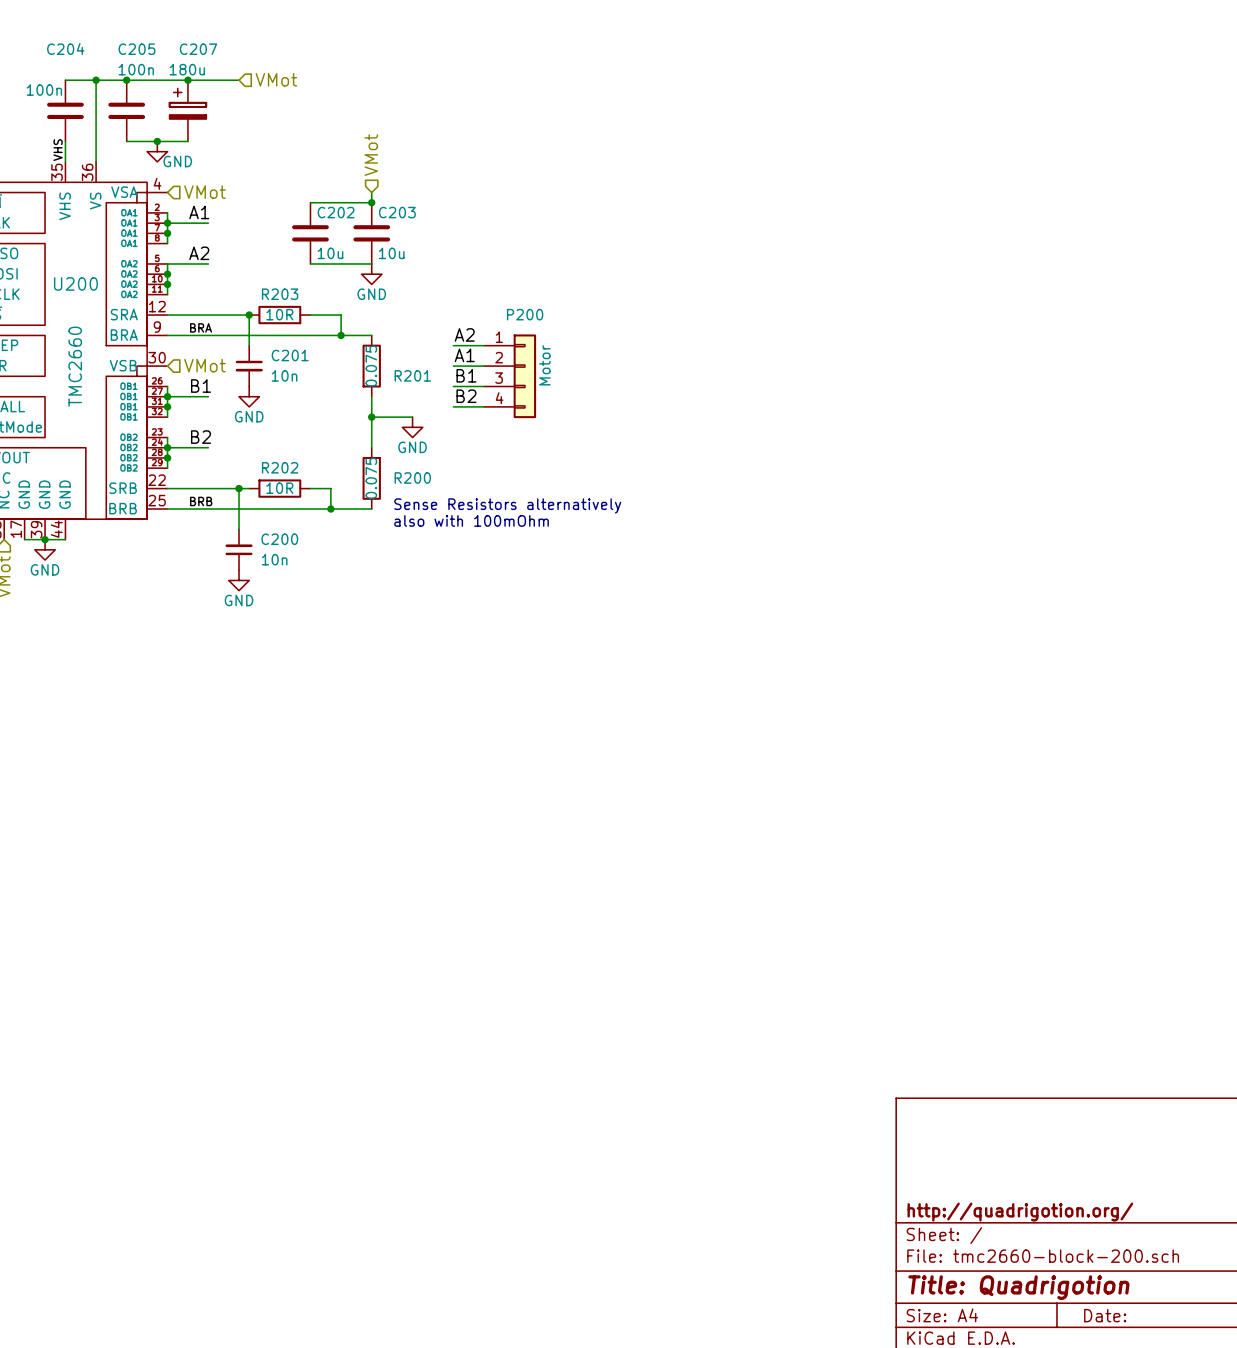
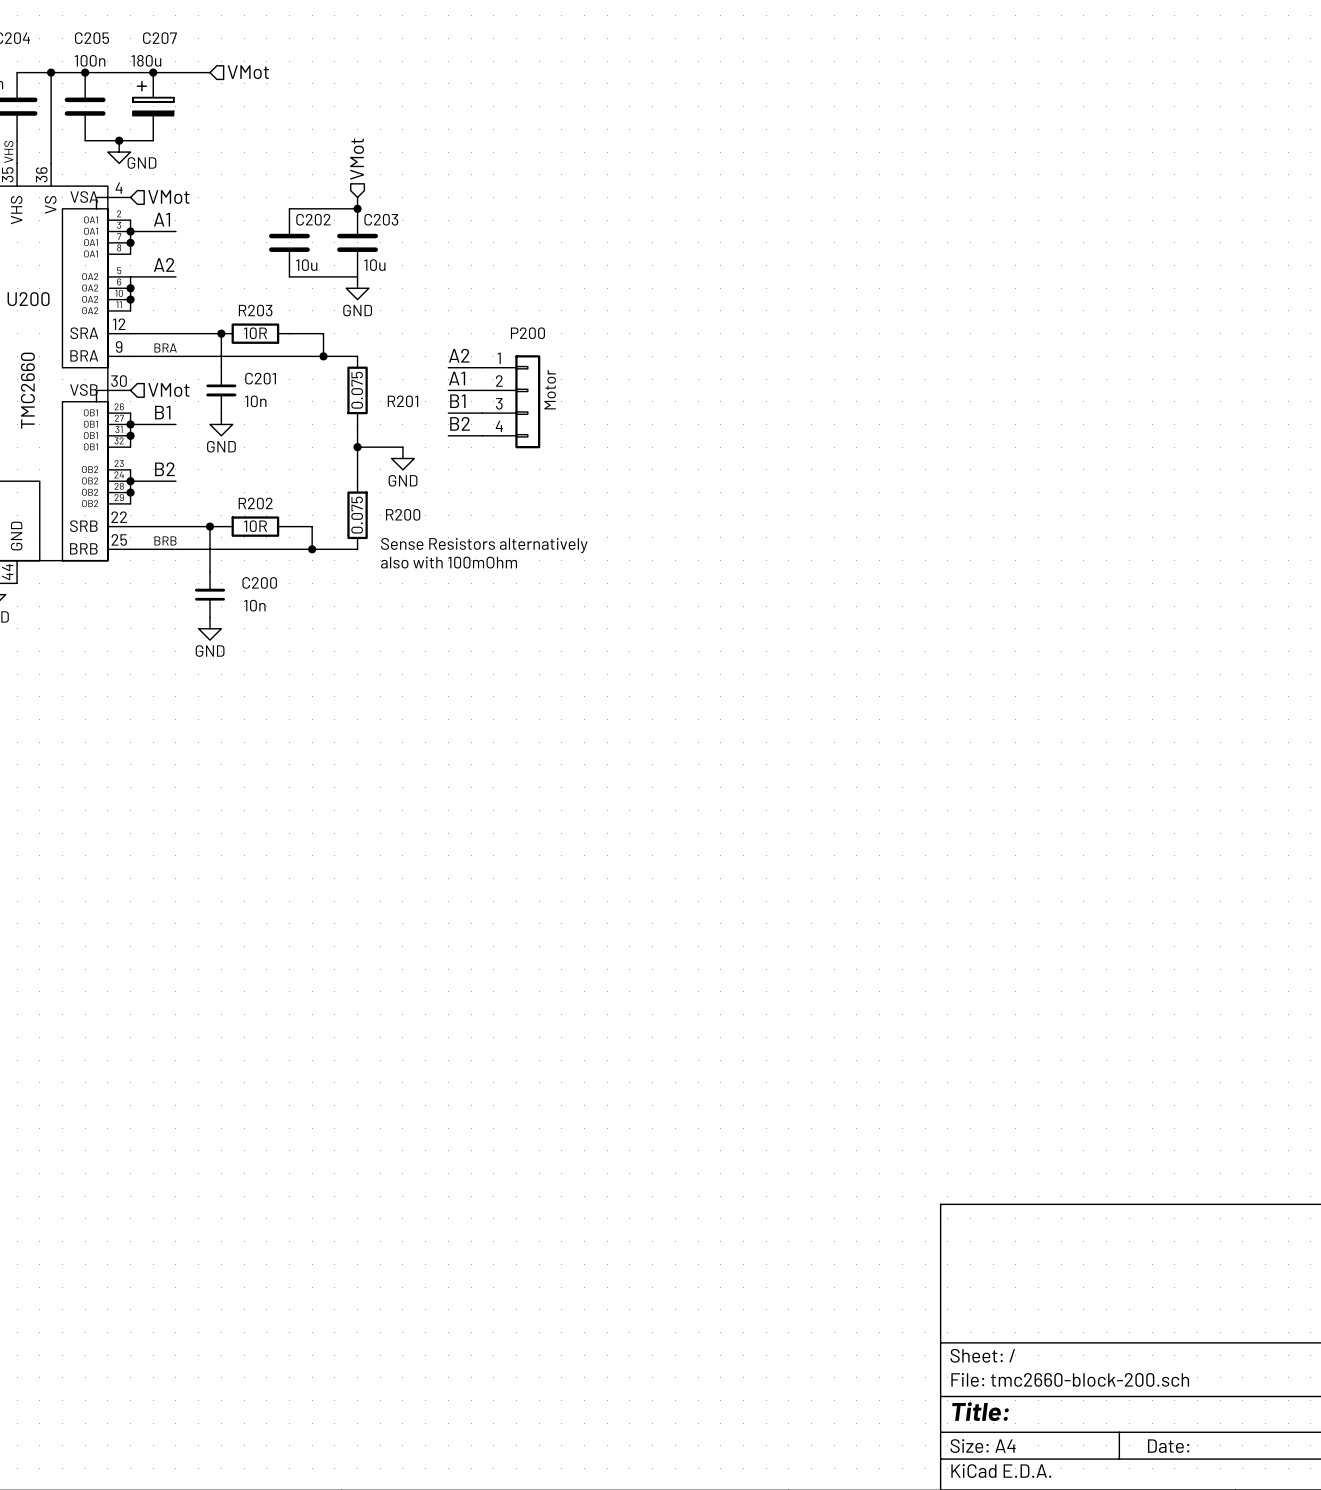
title block: http://quadrigotion.org/ (1020, 1212) -> none
title block: Title: Quadrigotion (1018, 1287) -> Title: (980, 1411)

